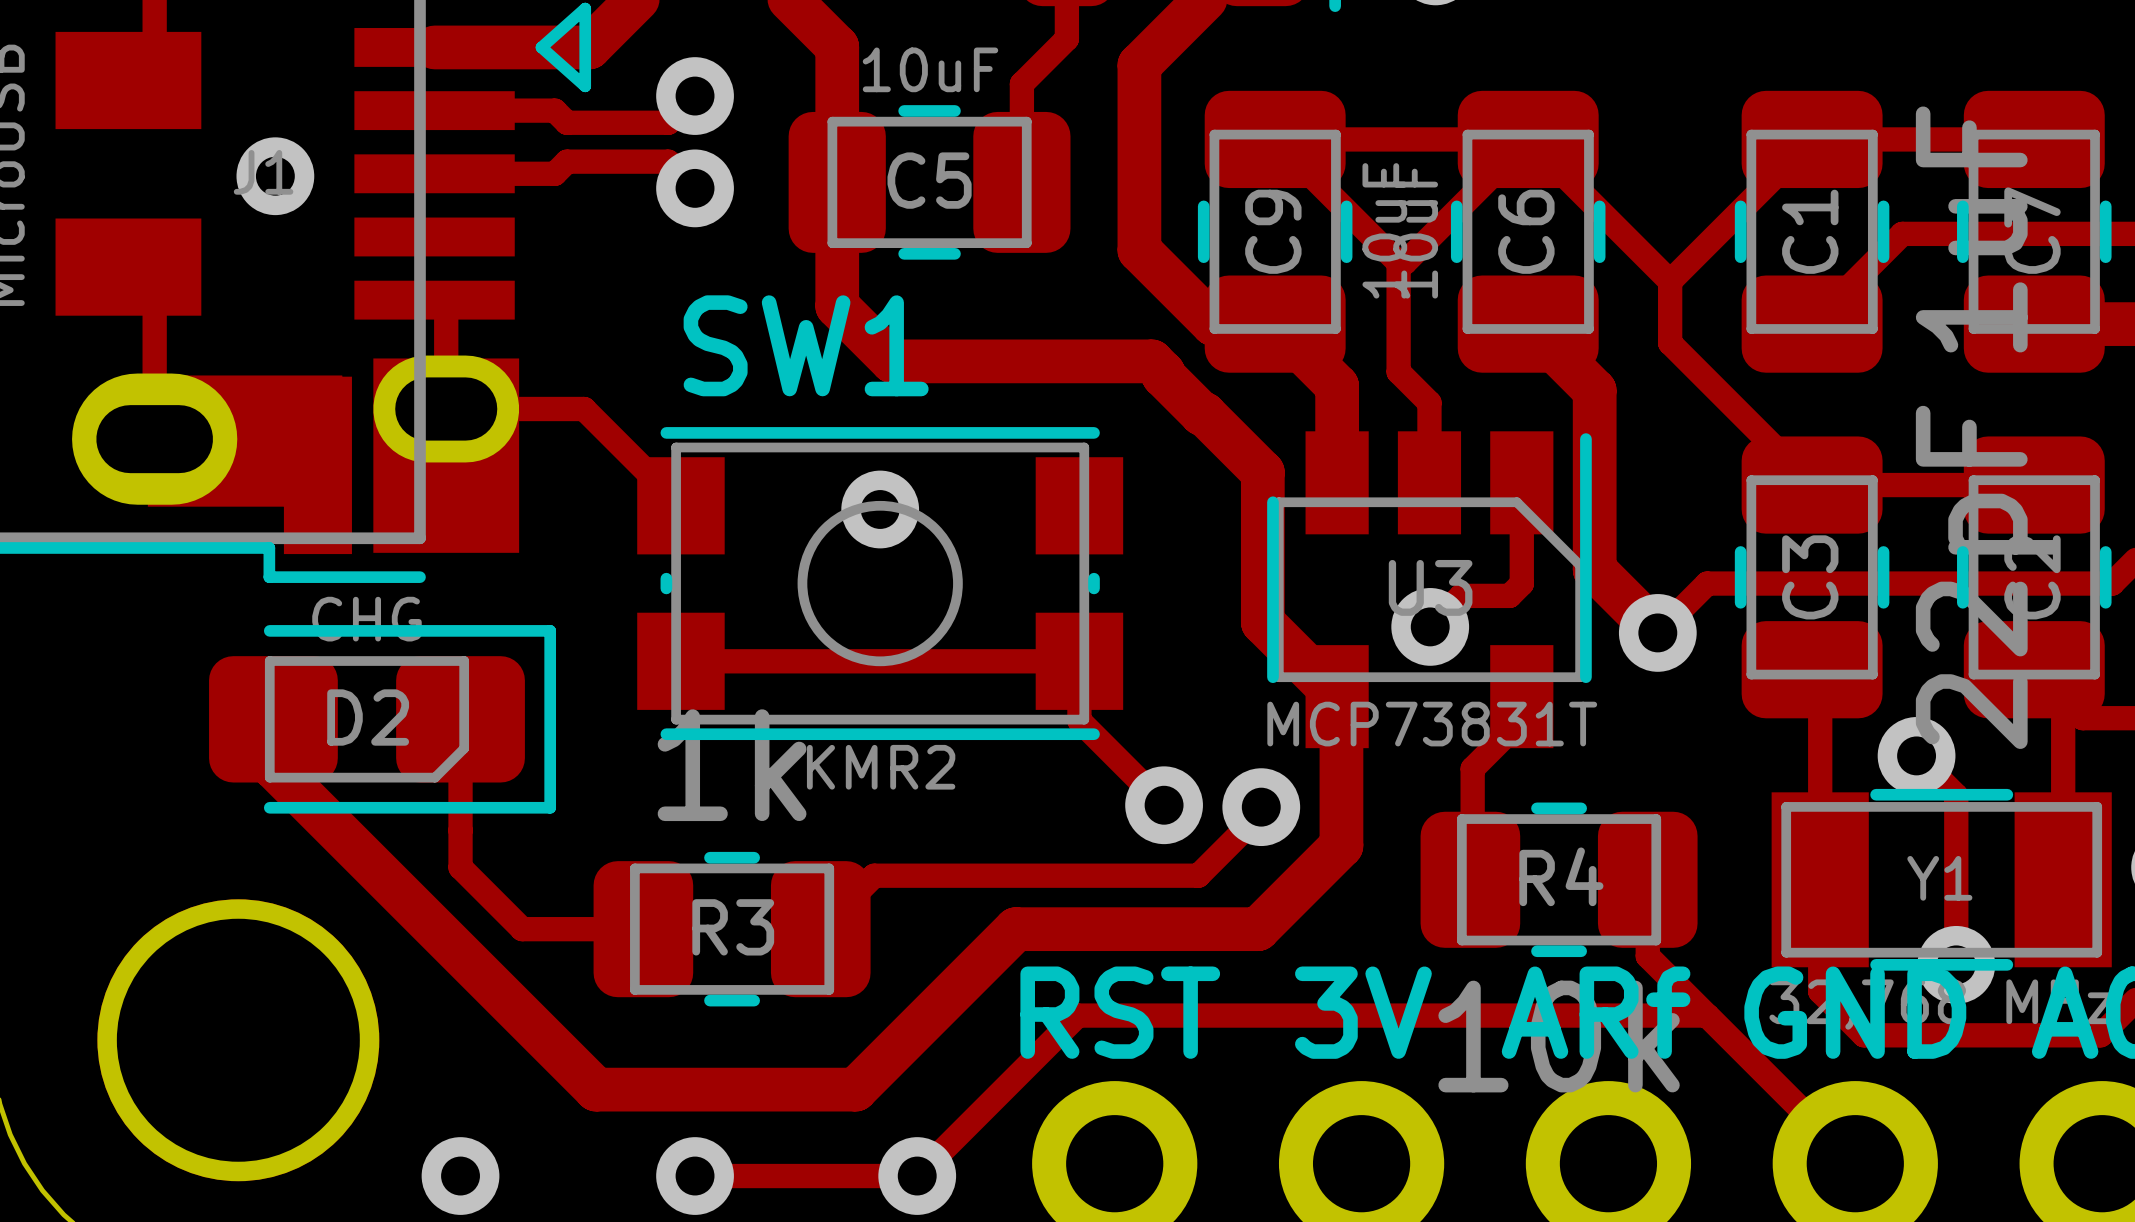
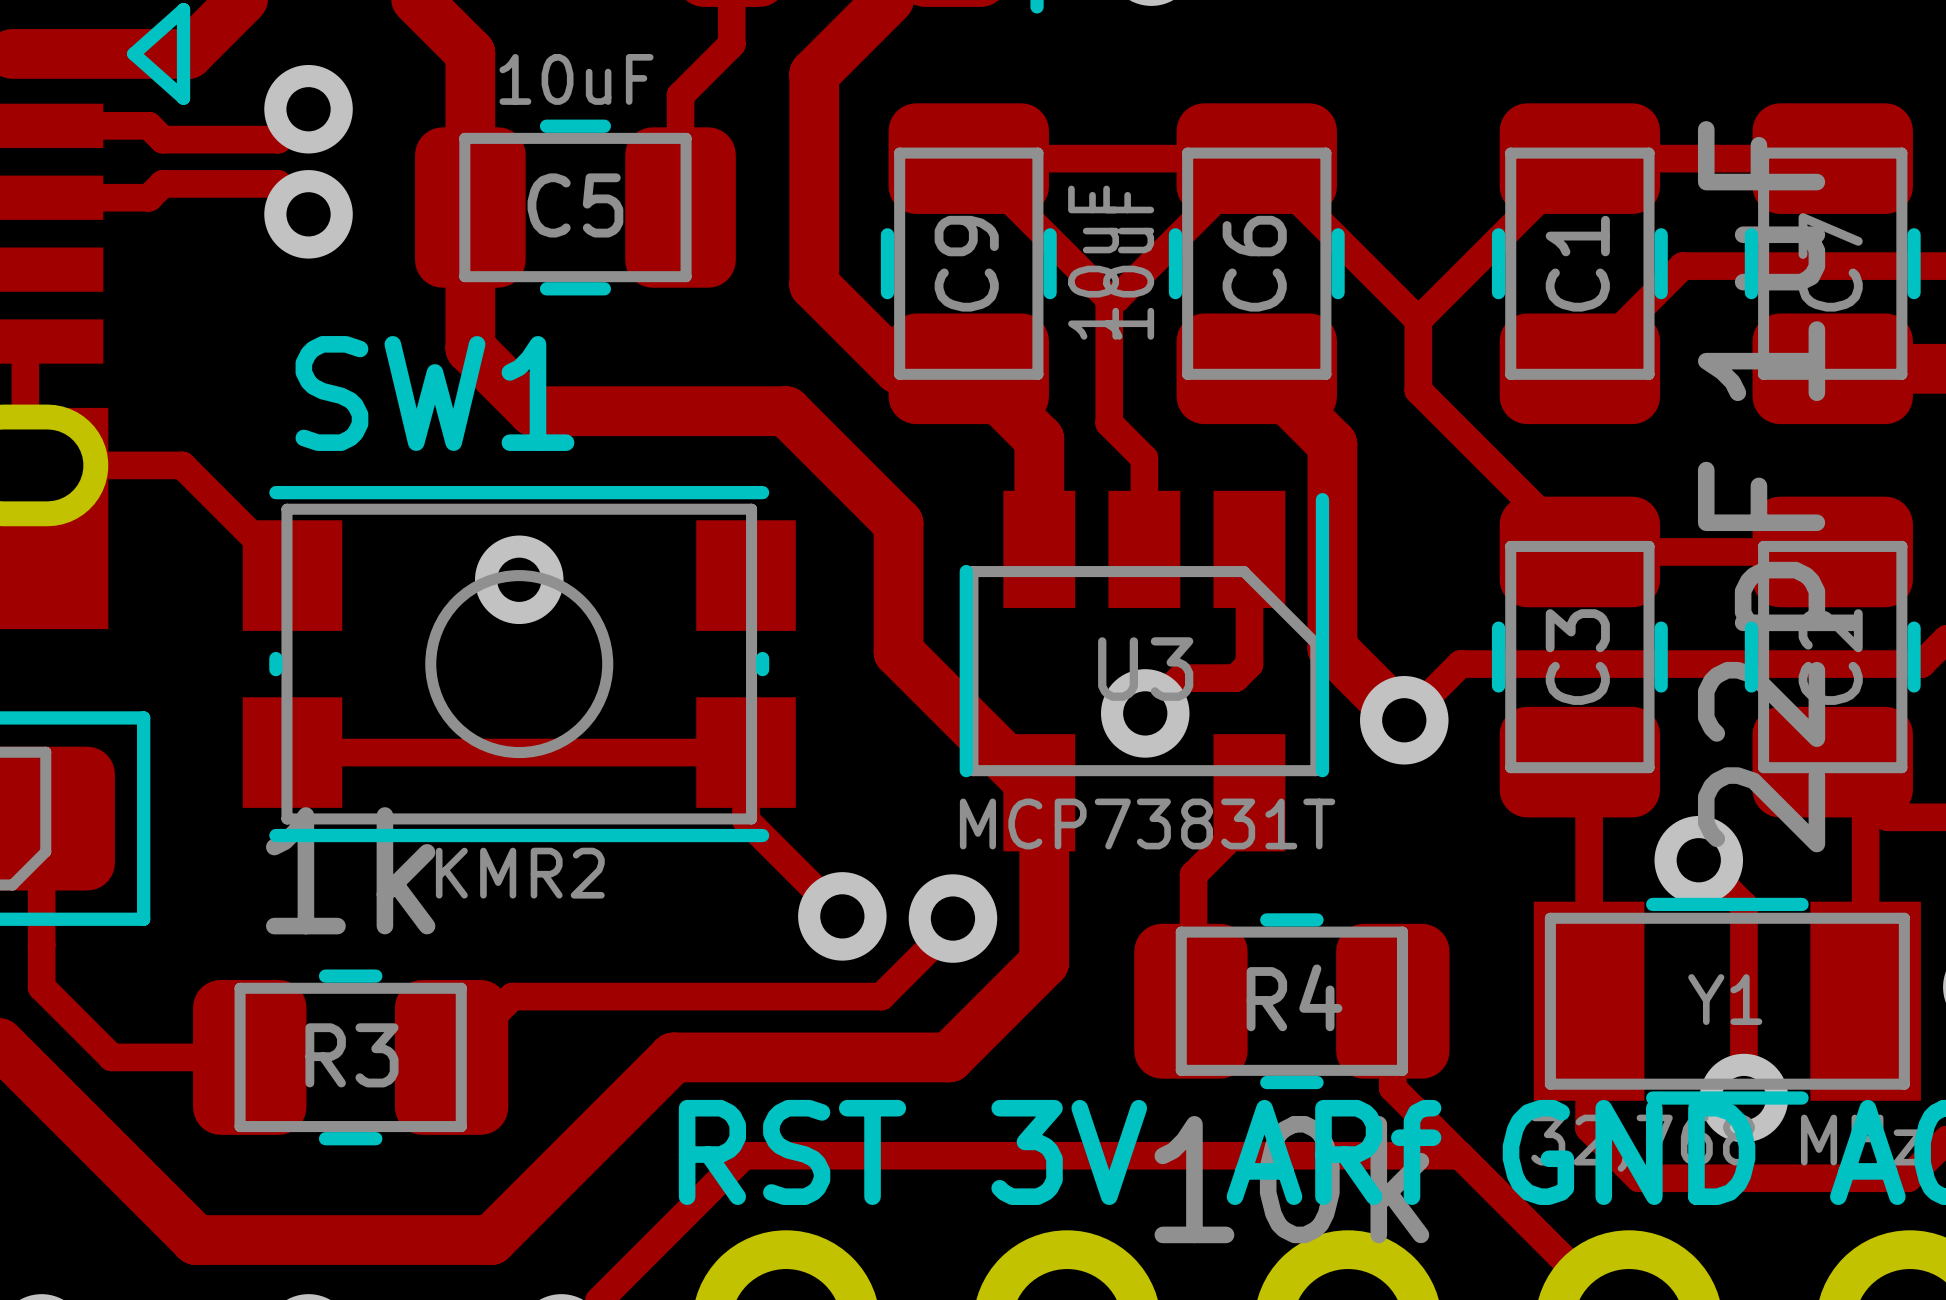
track: (1114, 361) (1151, 361) (1201, 414) (1204, 414) (1262, 472) (1262, 622) -> (786, 411) (898, 523) (898, 652) (954, 708)

